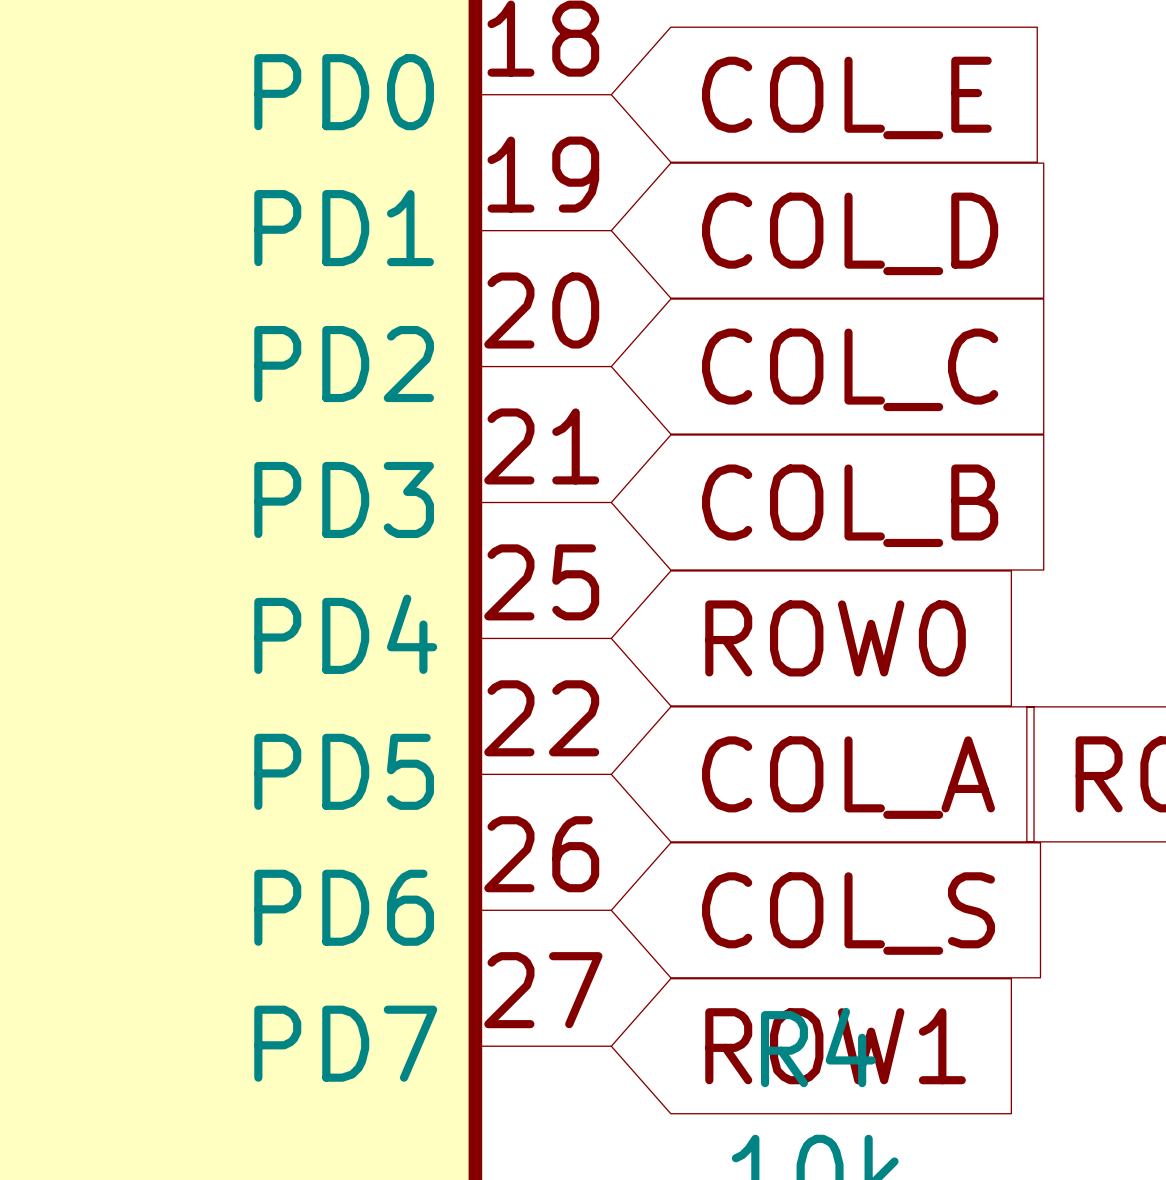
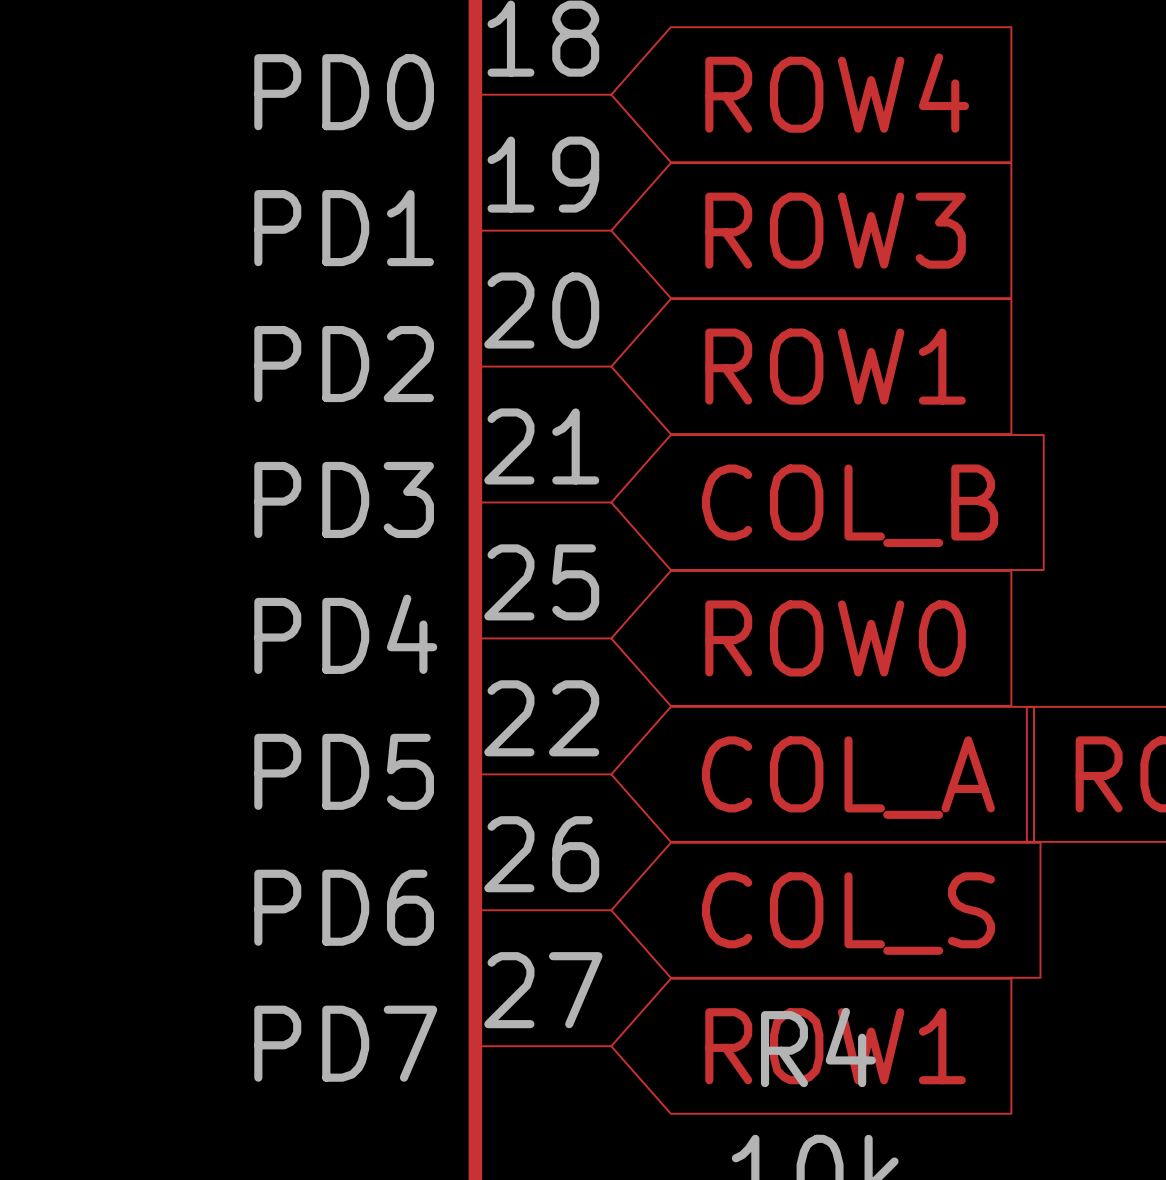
global label: COL_E (846, 97) -> ROW4 (837, 93)
global label: COL_D (850, 233) -> ROW3 (835, 230)
global label: COL_C (850, 369) -> ROW1 (835, 366)

